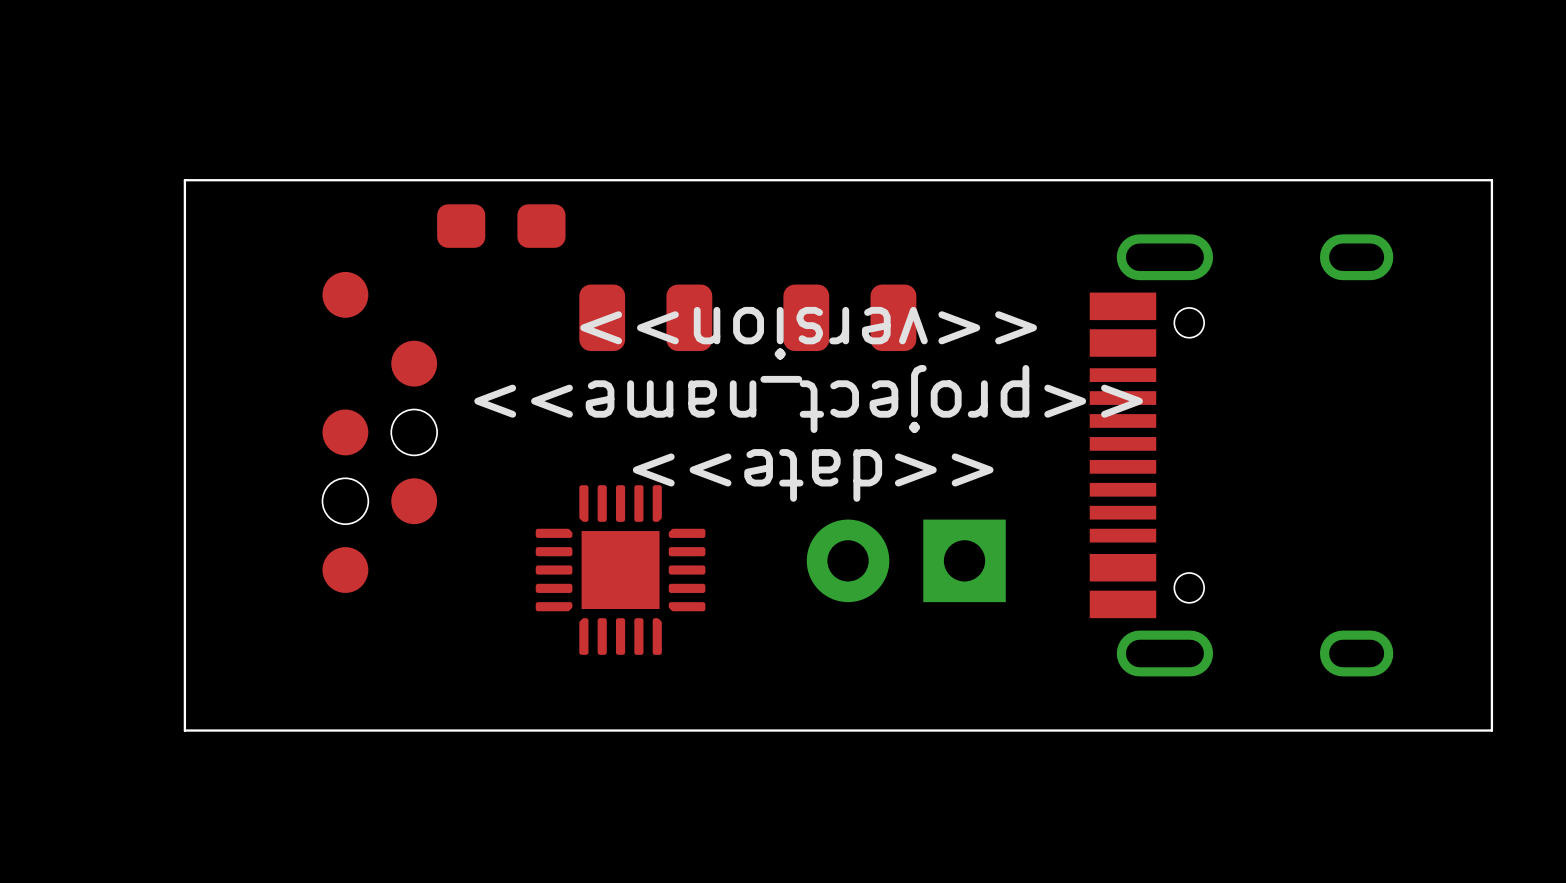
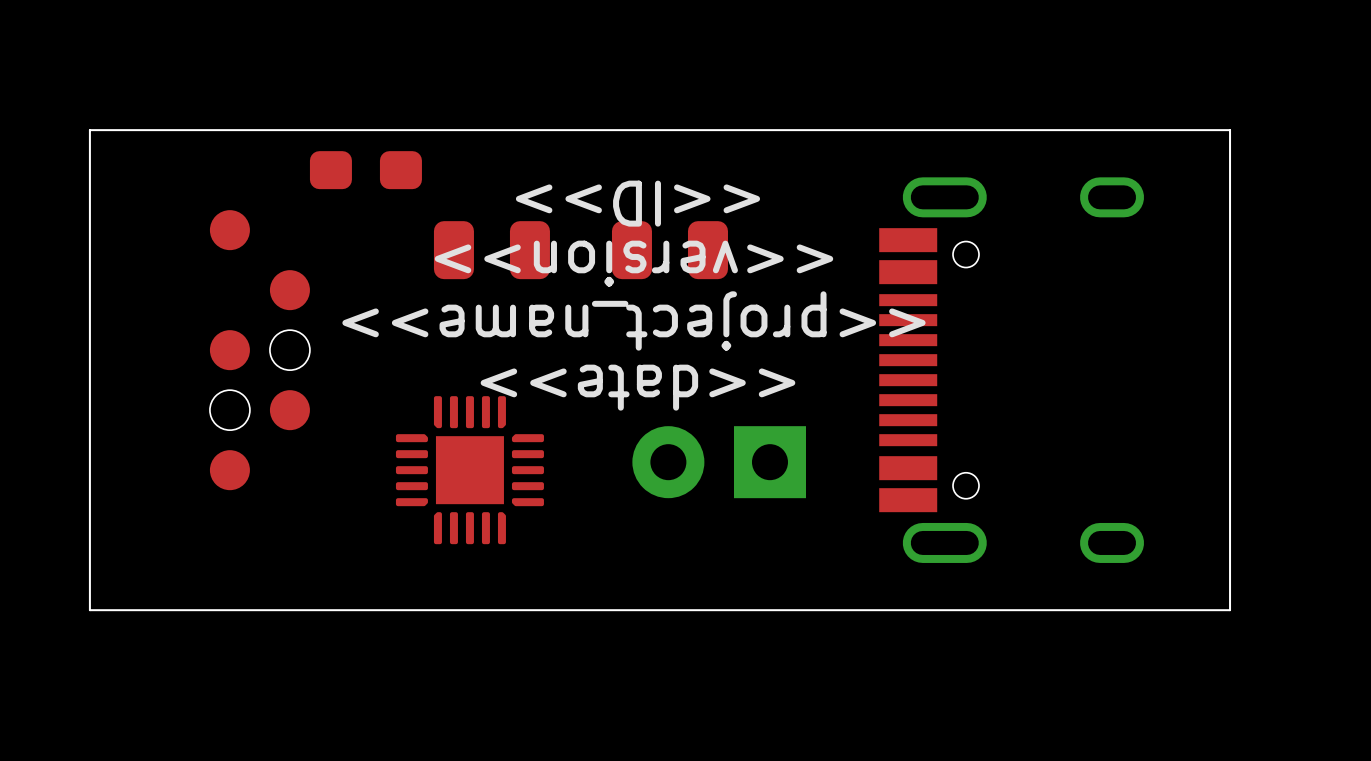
text: none -> <<ID>> (637, 203)

